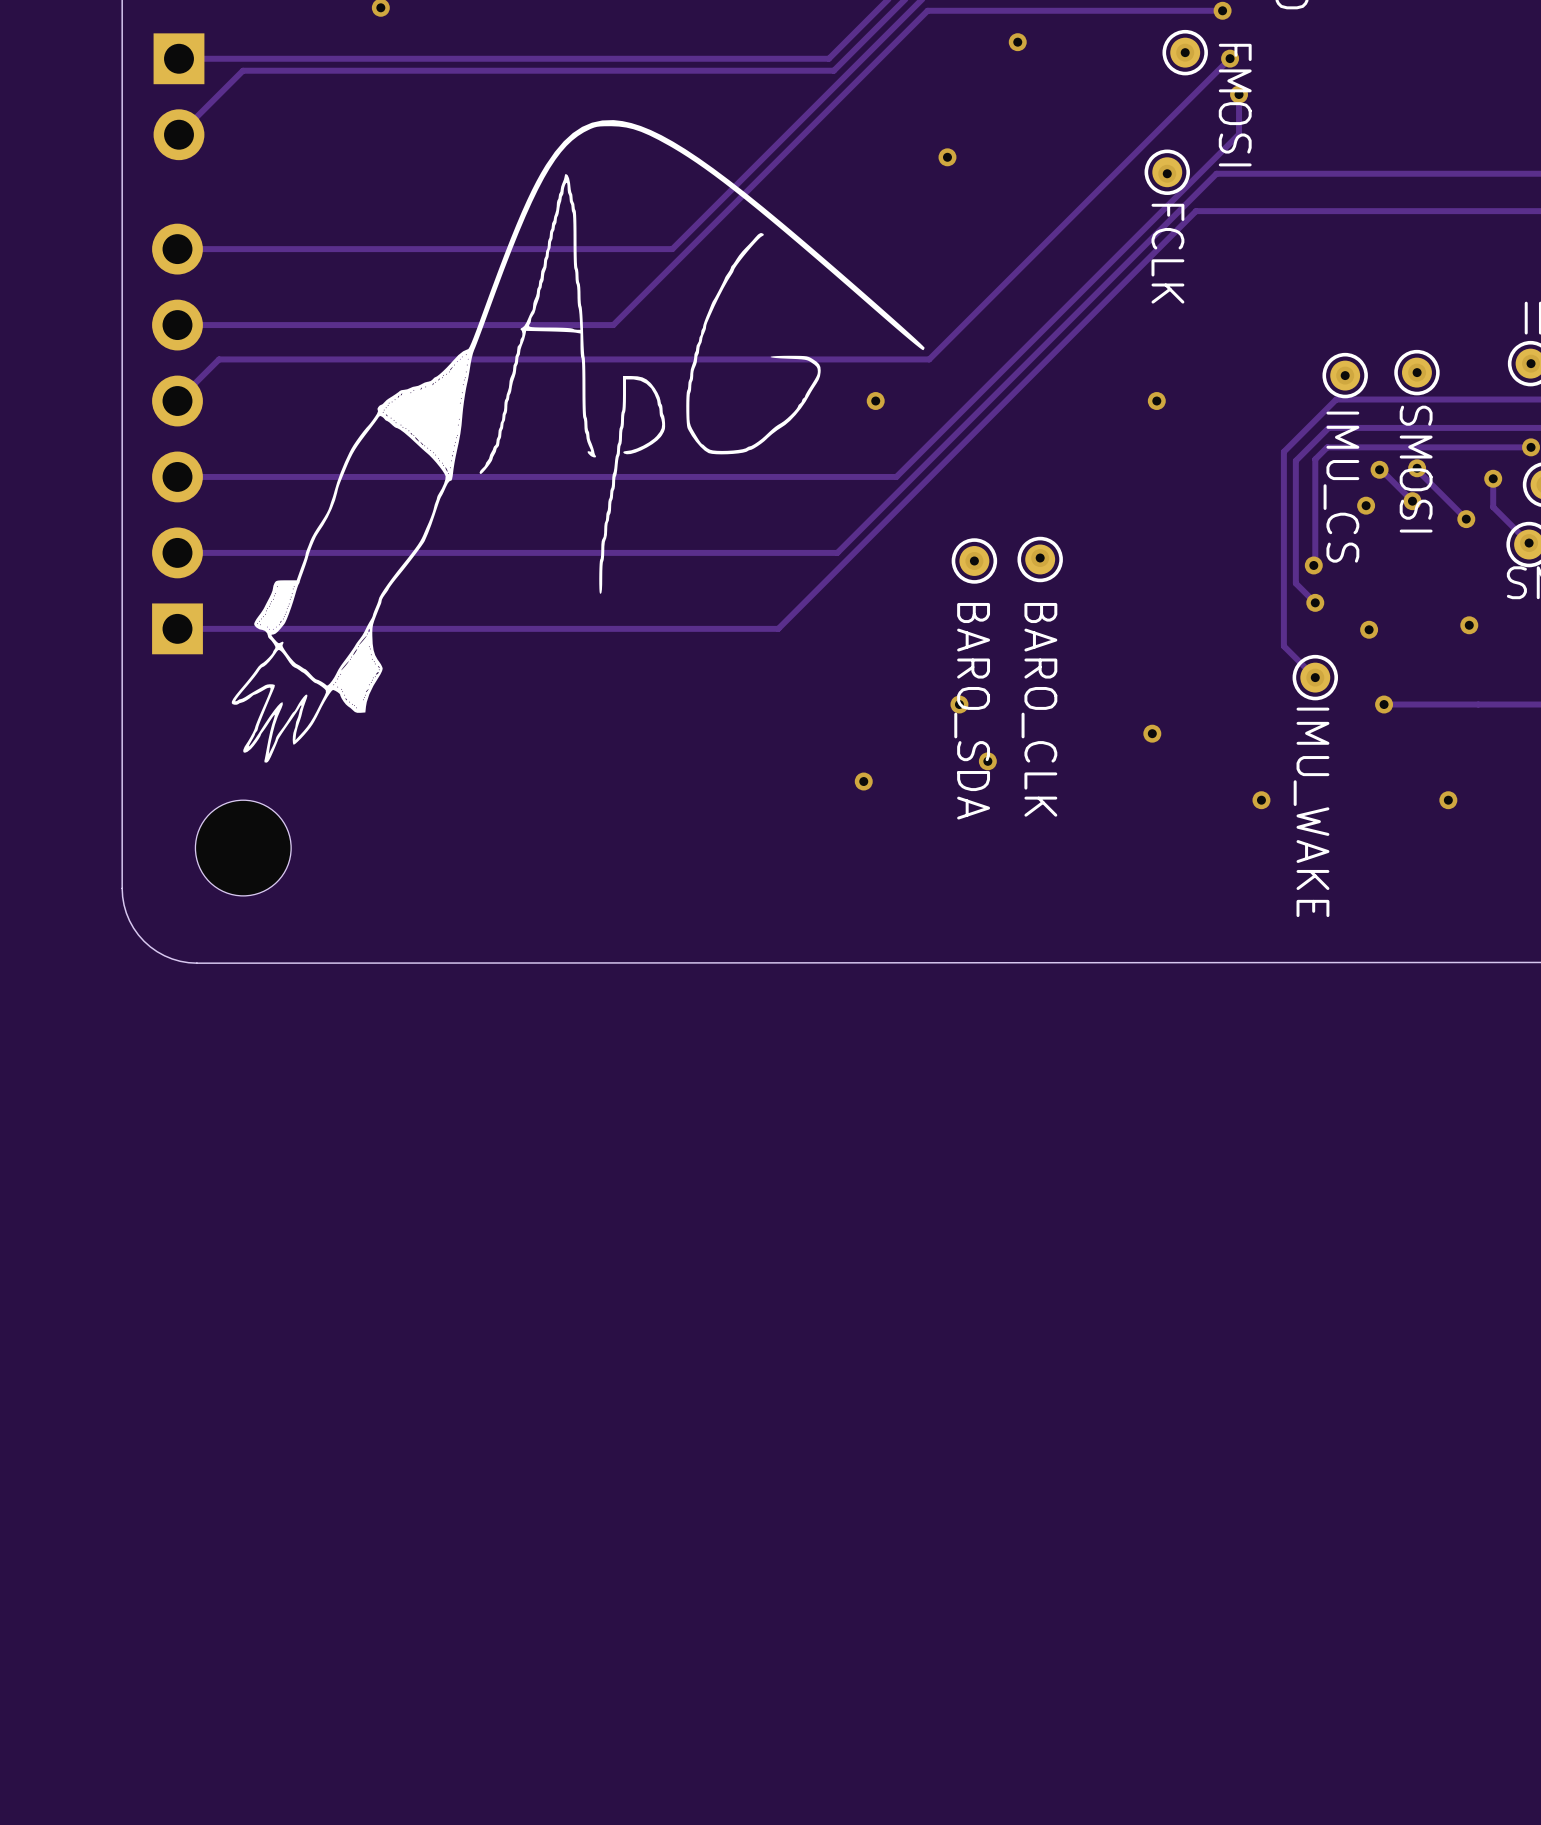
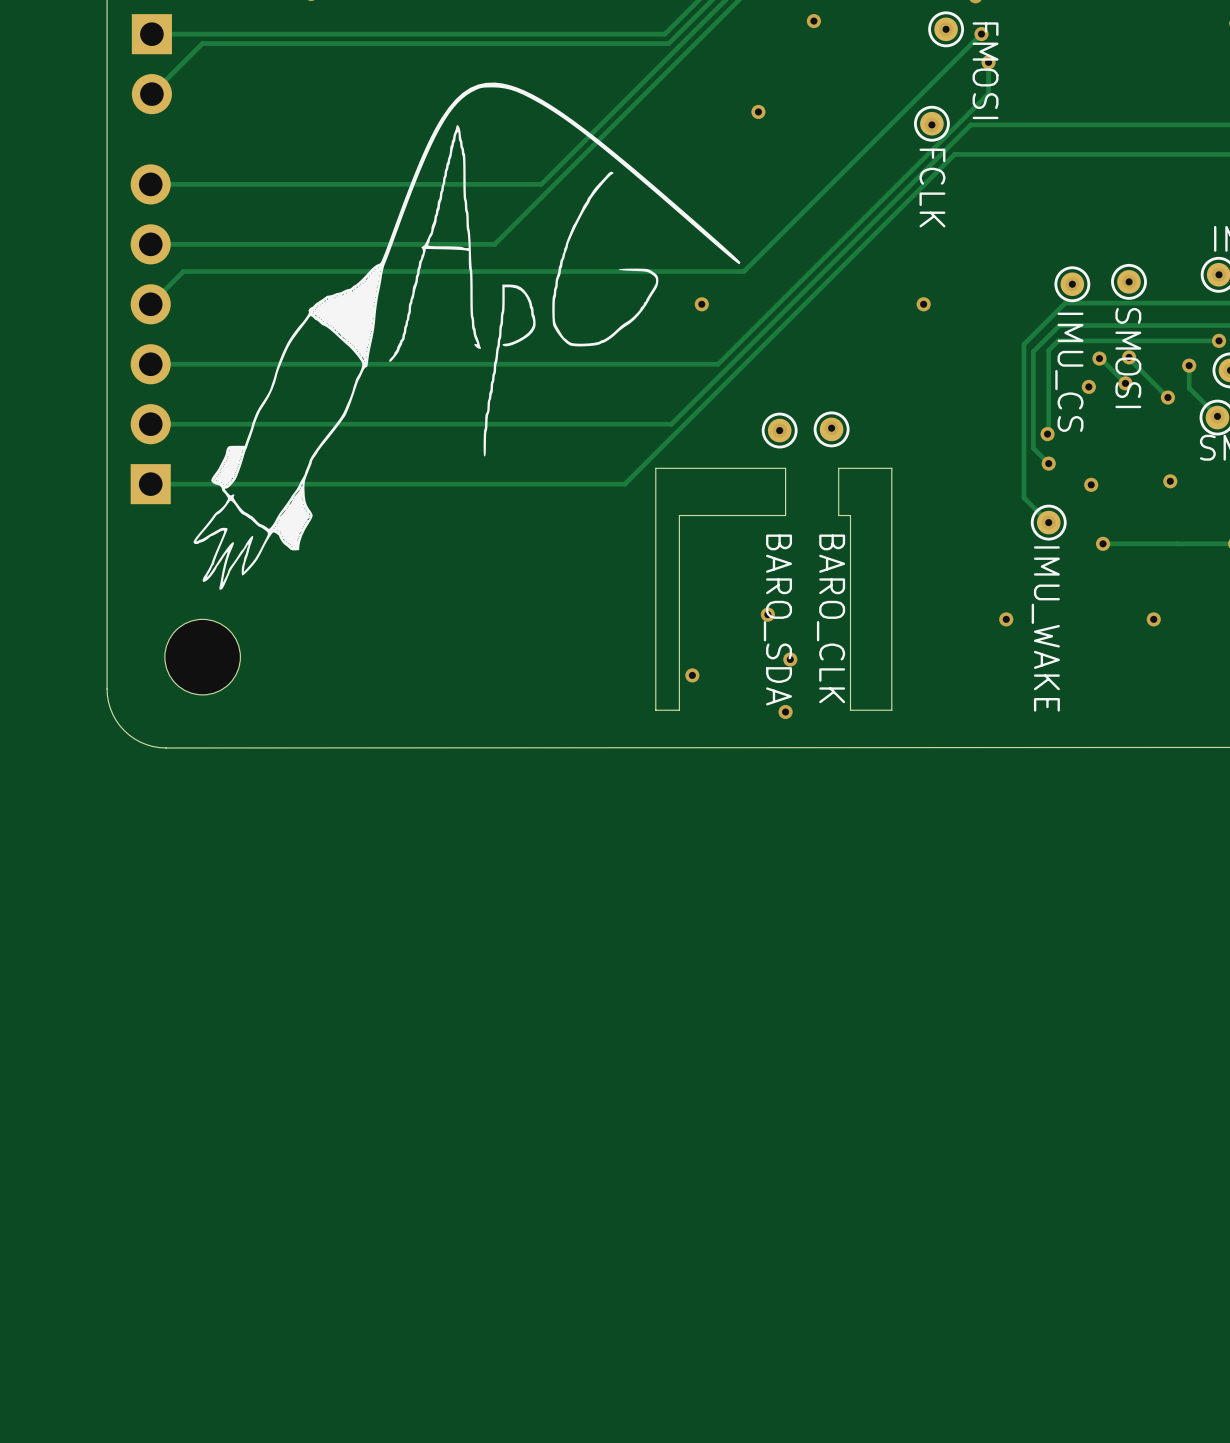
board edge: none -> (785, 468) (655, 468) (655, 710) (679, 710) (679, 515) (785, 515) (785, 468)
board edge: none -> (891, 468) (891, 710) (850, 710) (850, 515) (838, 515) (838, 468) (891, 468)
via: (959, 704) -> none
text position: BARO_CLK (1039, 709) -> BARO_CLK (831, 618)
text position: BARO_SDA (972, 711) -> BARO_SDA (777, 619)
via: (1152, 733) -> none
via position: (987, 761) -> (767, 614)
via: (863, 781) -> none
via: none -> (790, 659)
via: none -> (692, 675)
via: none -> (785, 712)

